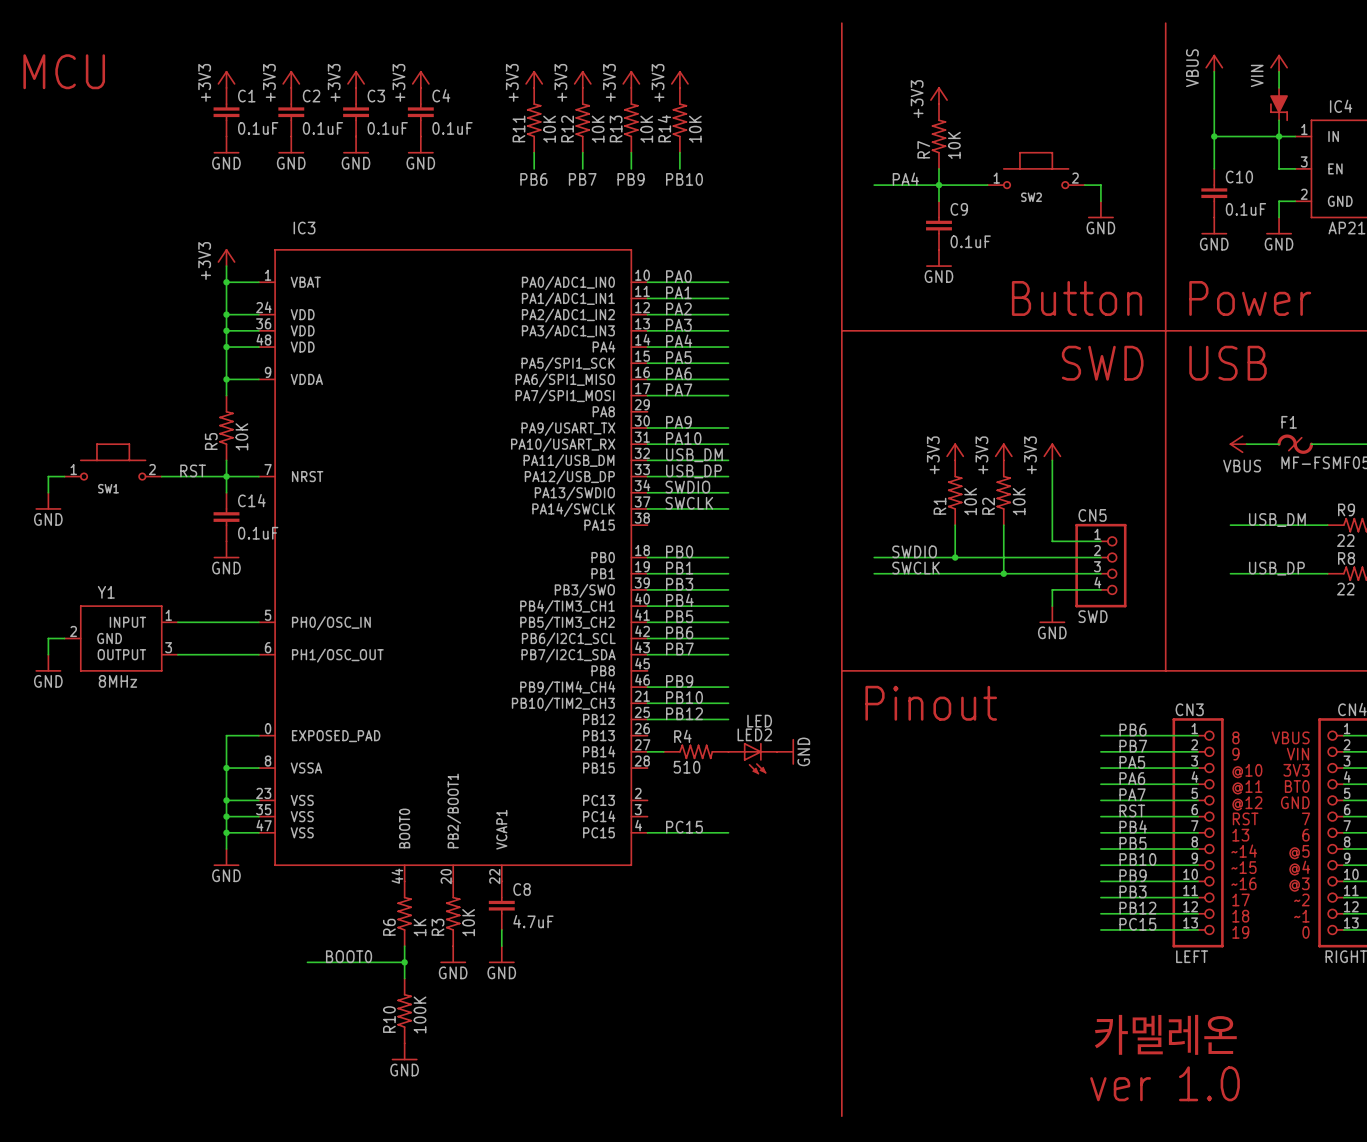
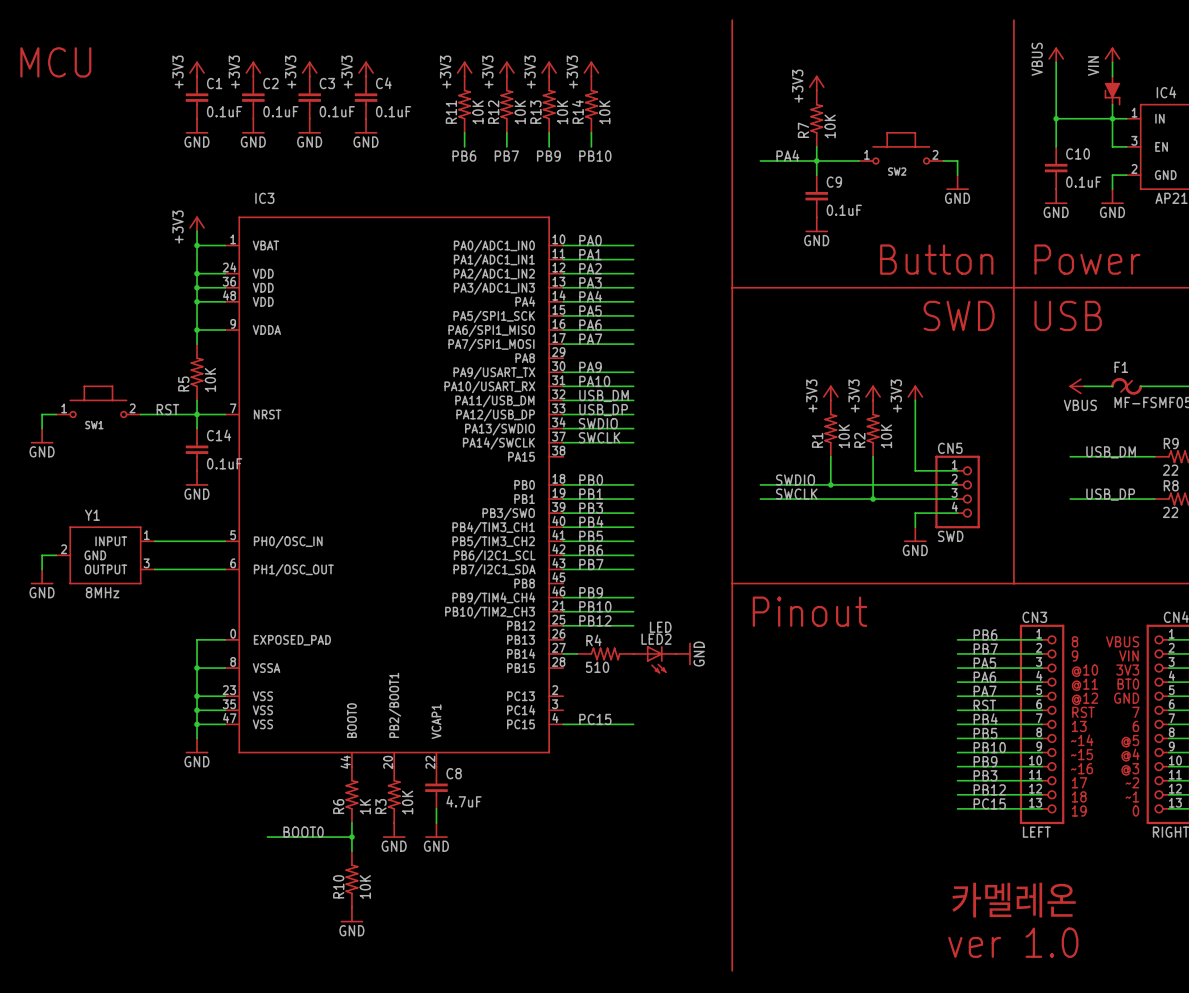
R10 value: 100K (420, 1014) -> 10K (365, 887)

